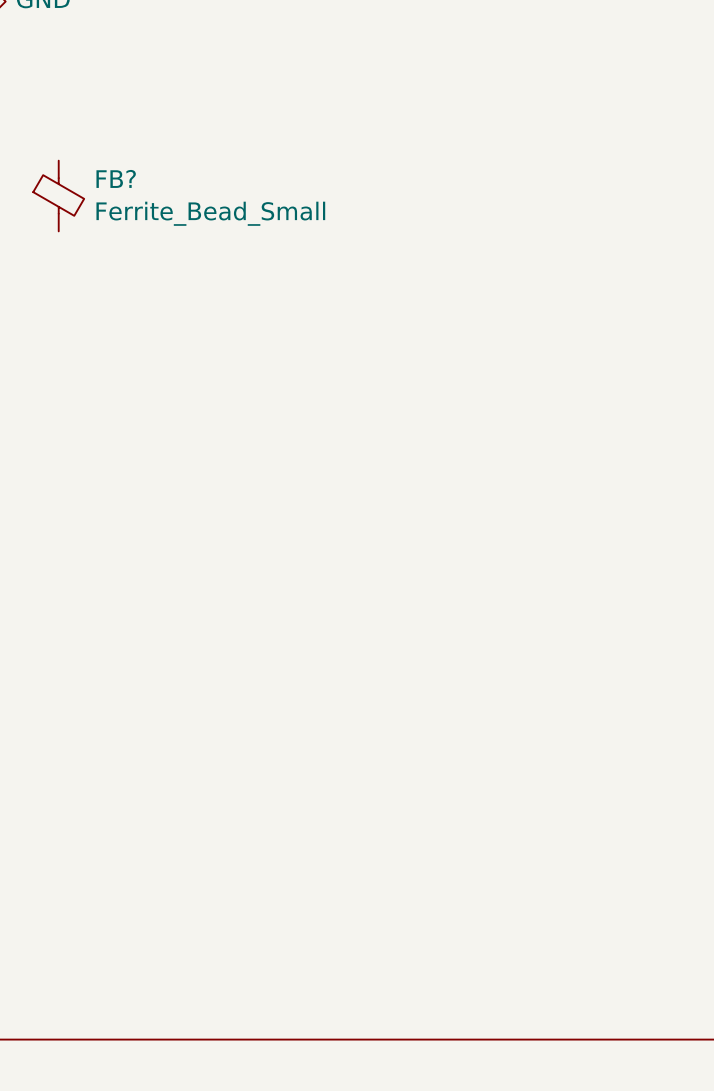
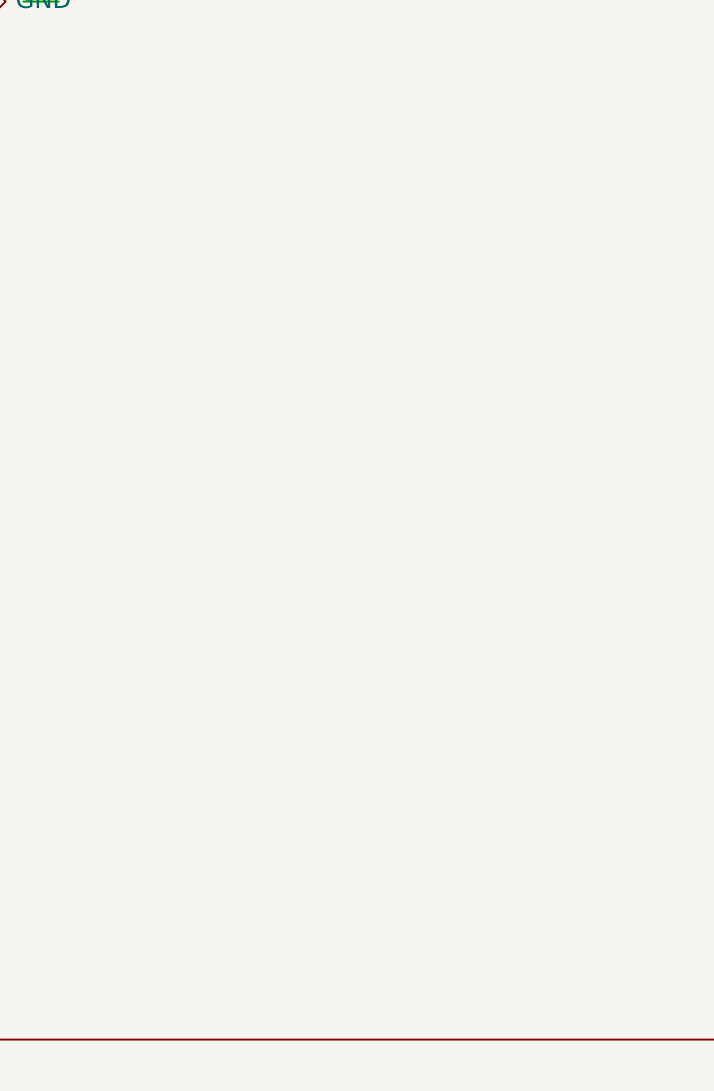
wire: none -> (23, 1) (58, 1)
FB?: Ferrite_Bead_Small (58, 196) -> none

